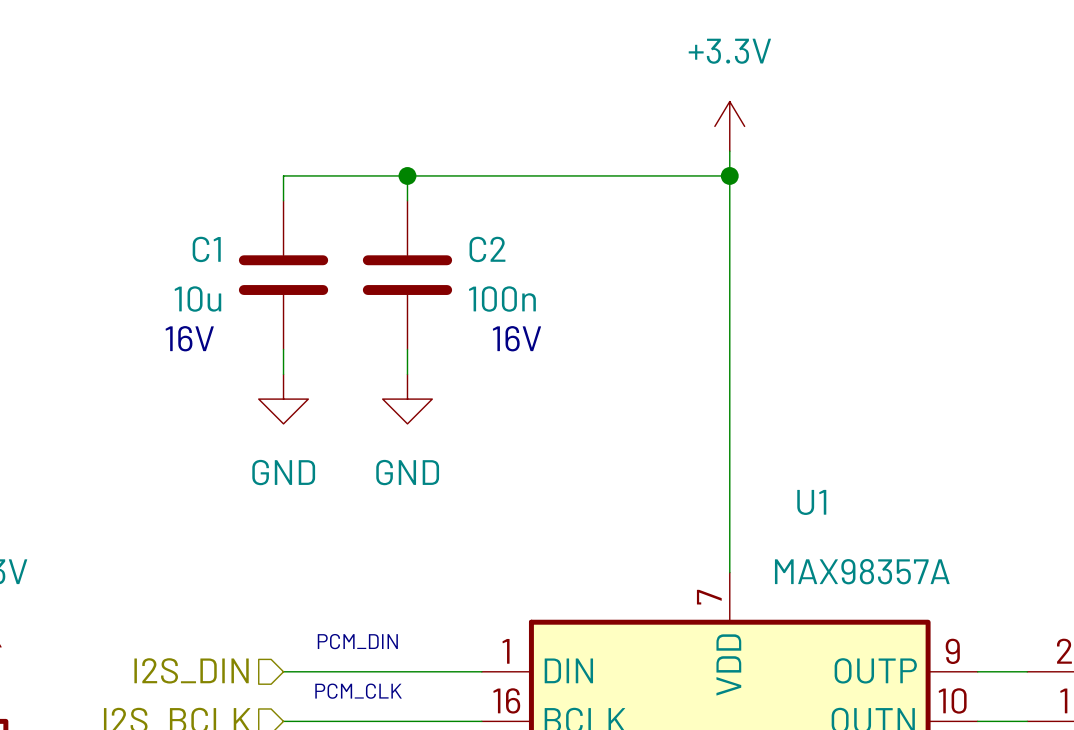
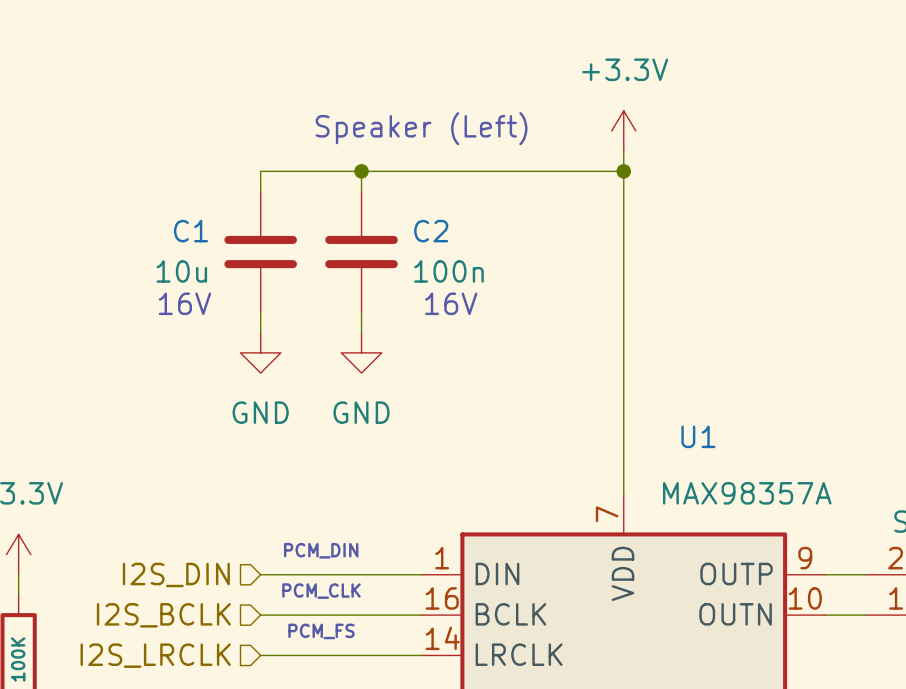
text: none -> Speaker (Left) (421, 128)

